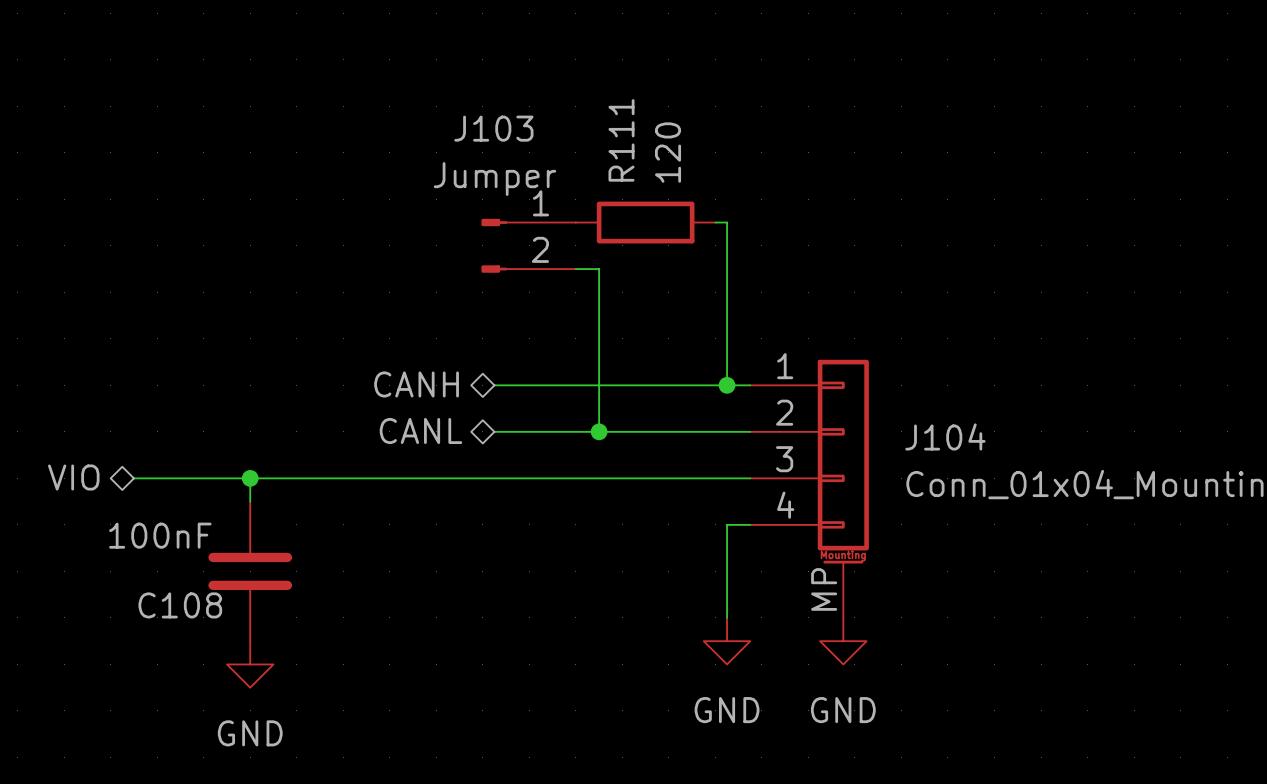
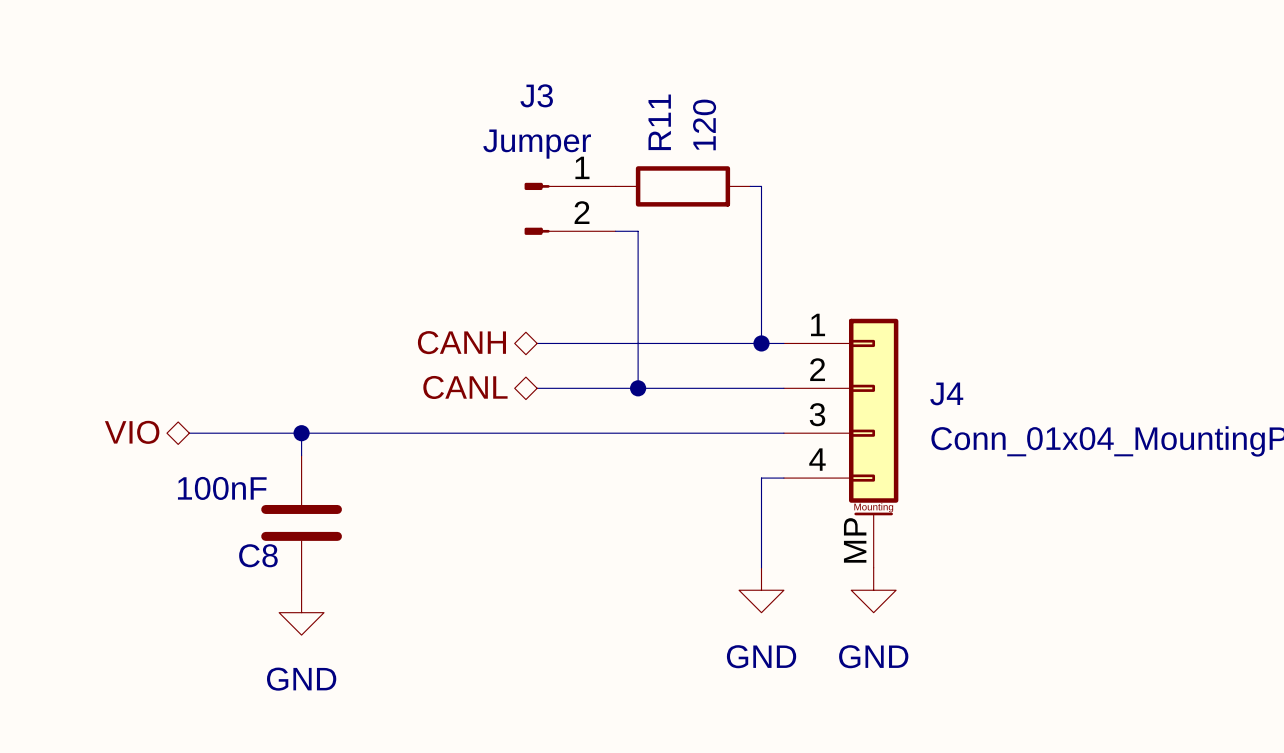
J103 name: J103 (493, 128) -> J3 (536, 95)
R111 name: R111 (621, 140) -> R11 (659, 122)
J104 name: J104 (945, 436) -> J4 (946, 393)
C108 name: C108 (180, 605) -> C8 (258, 555)

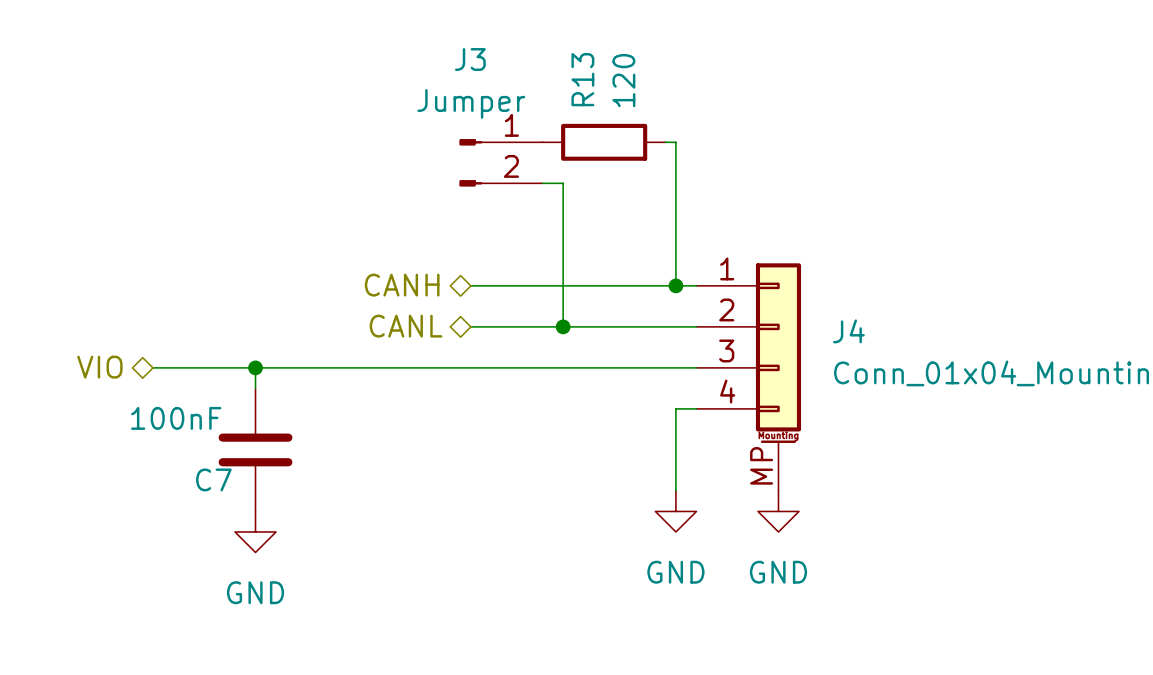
R11 name: R11 (659, 122) -> R13 (582, 79)
C8 name: C8 (258, 555) -> C7 (213, 479)

